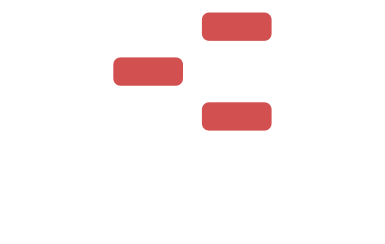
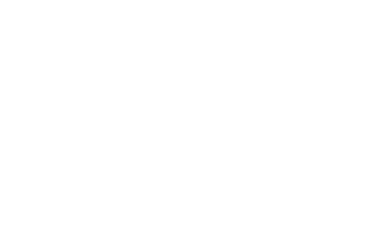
part: (192, 71) -> none

